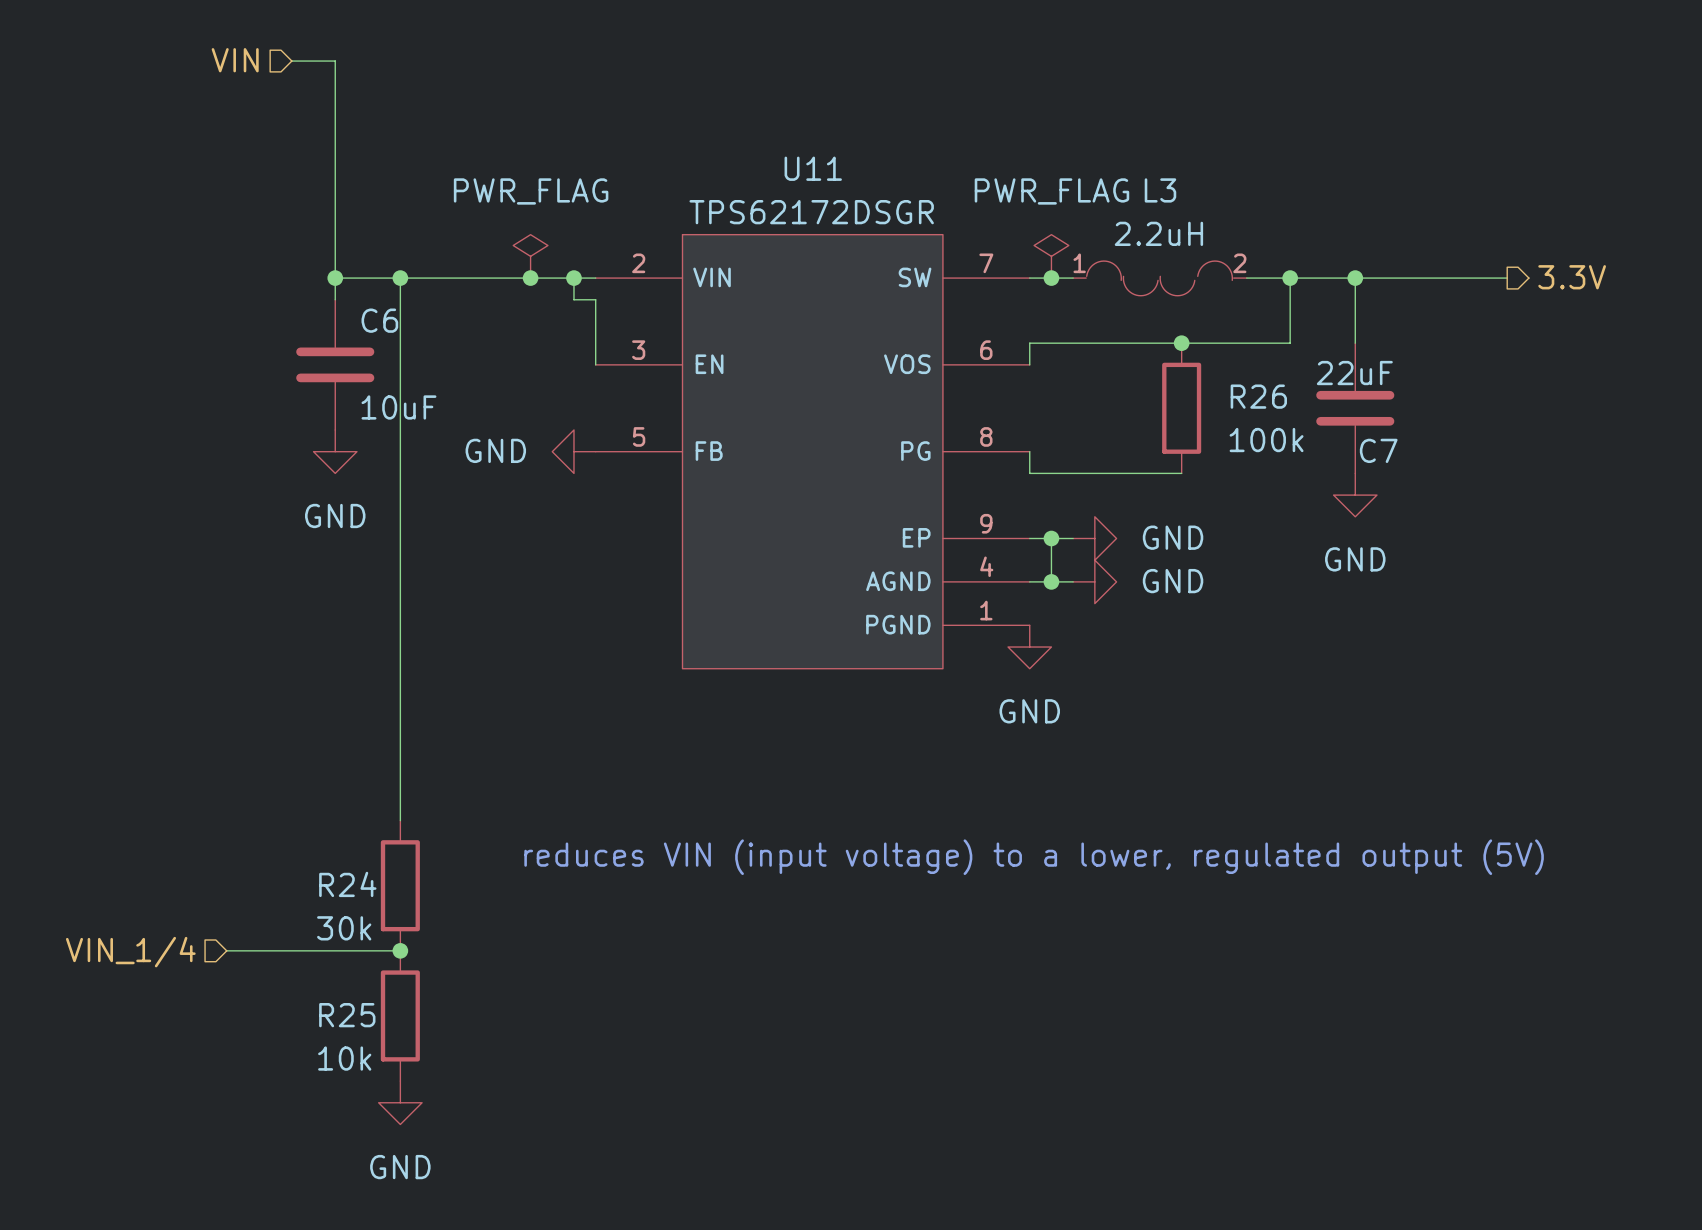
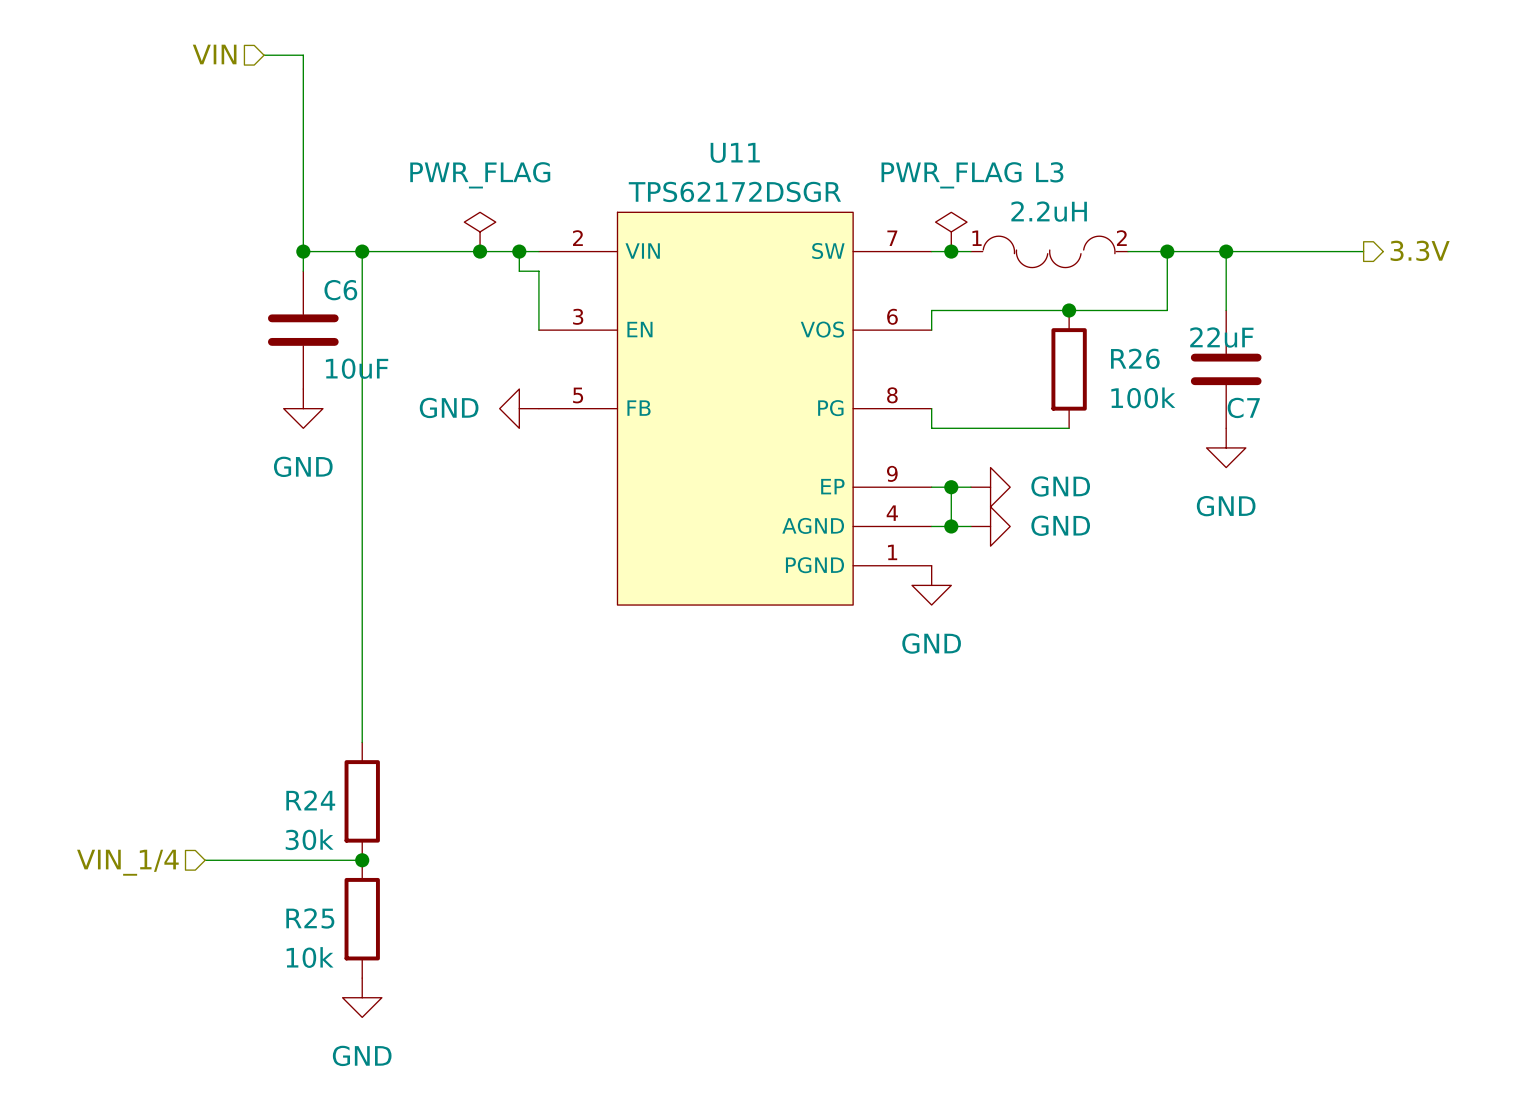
text: reduces VIN (input voltage) to a lower, regulated output (5V) (1034, 857) -> none

